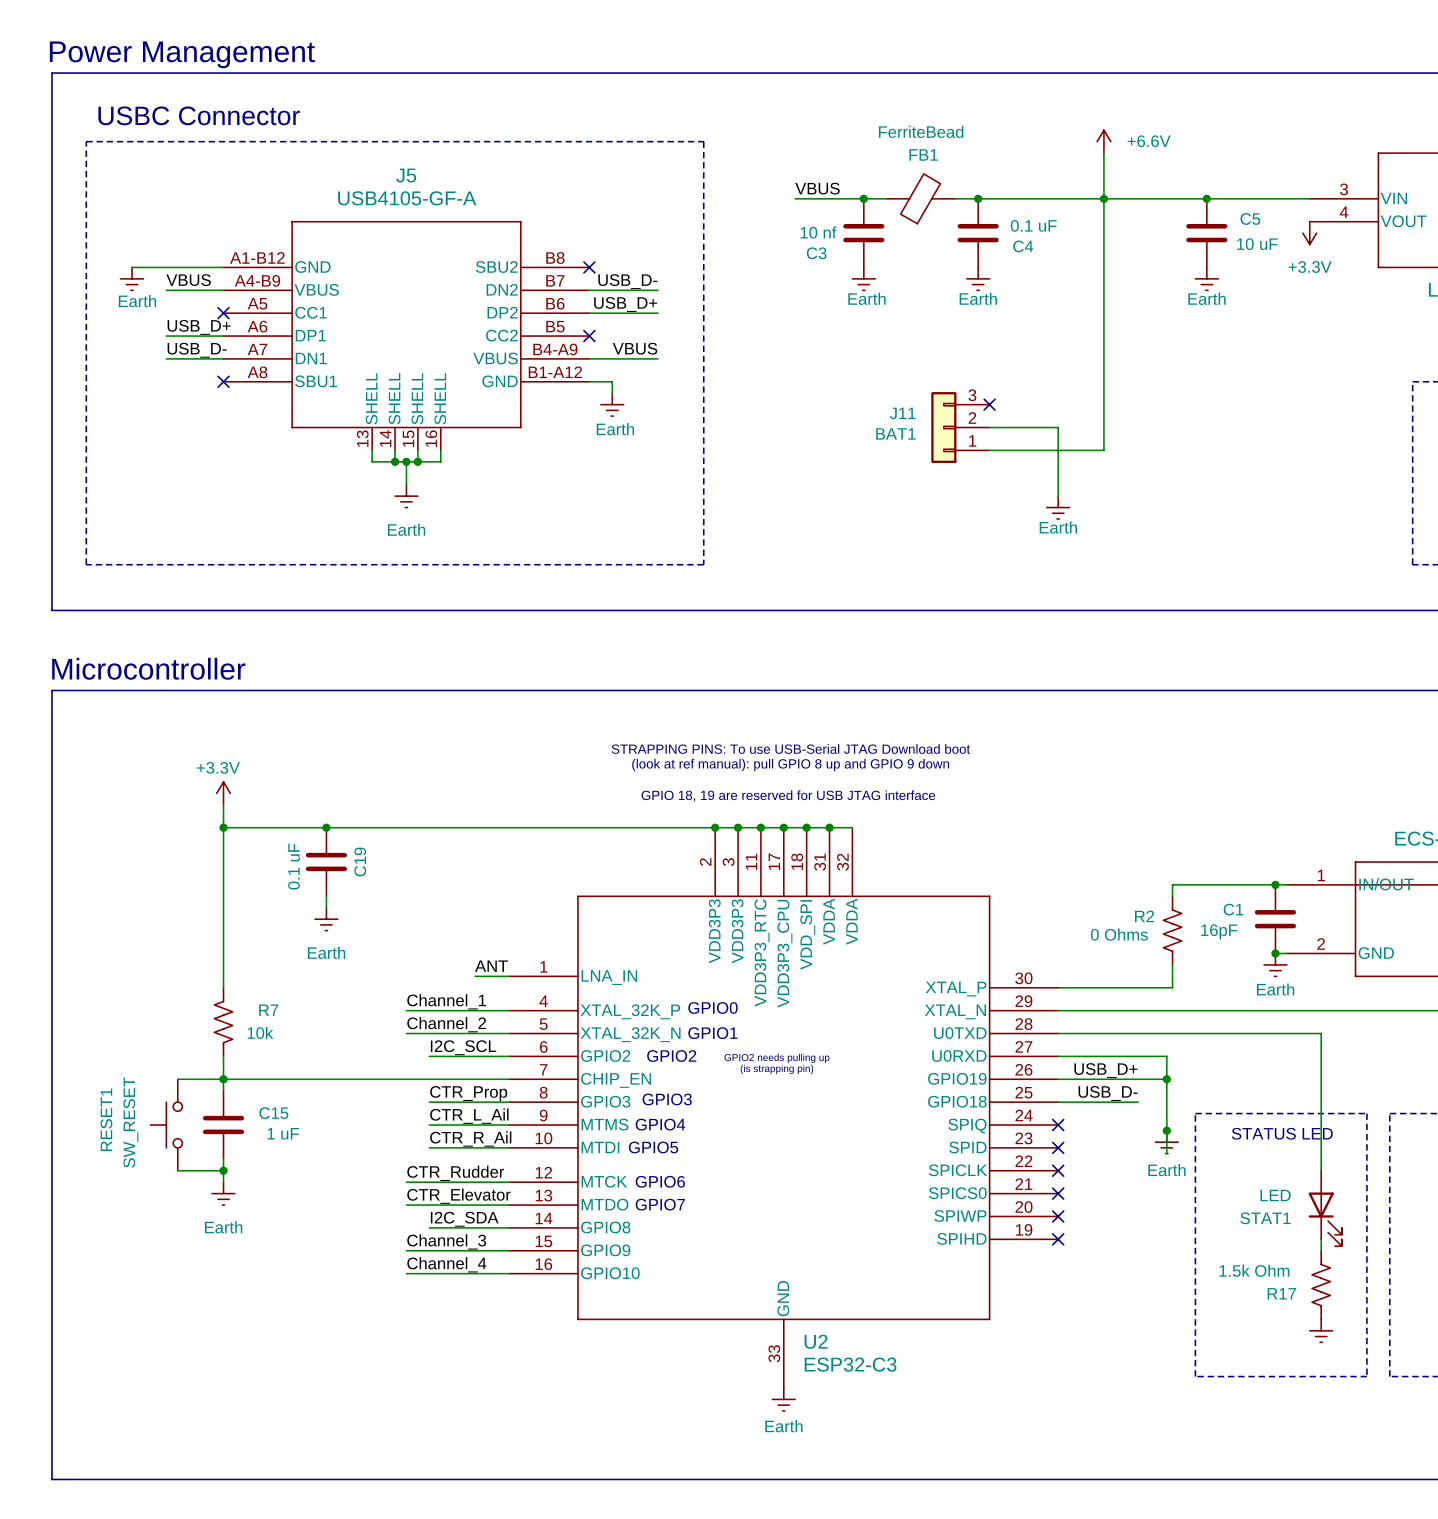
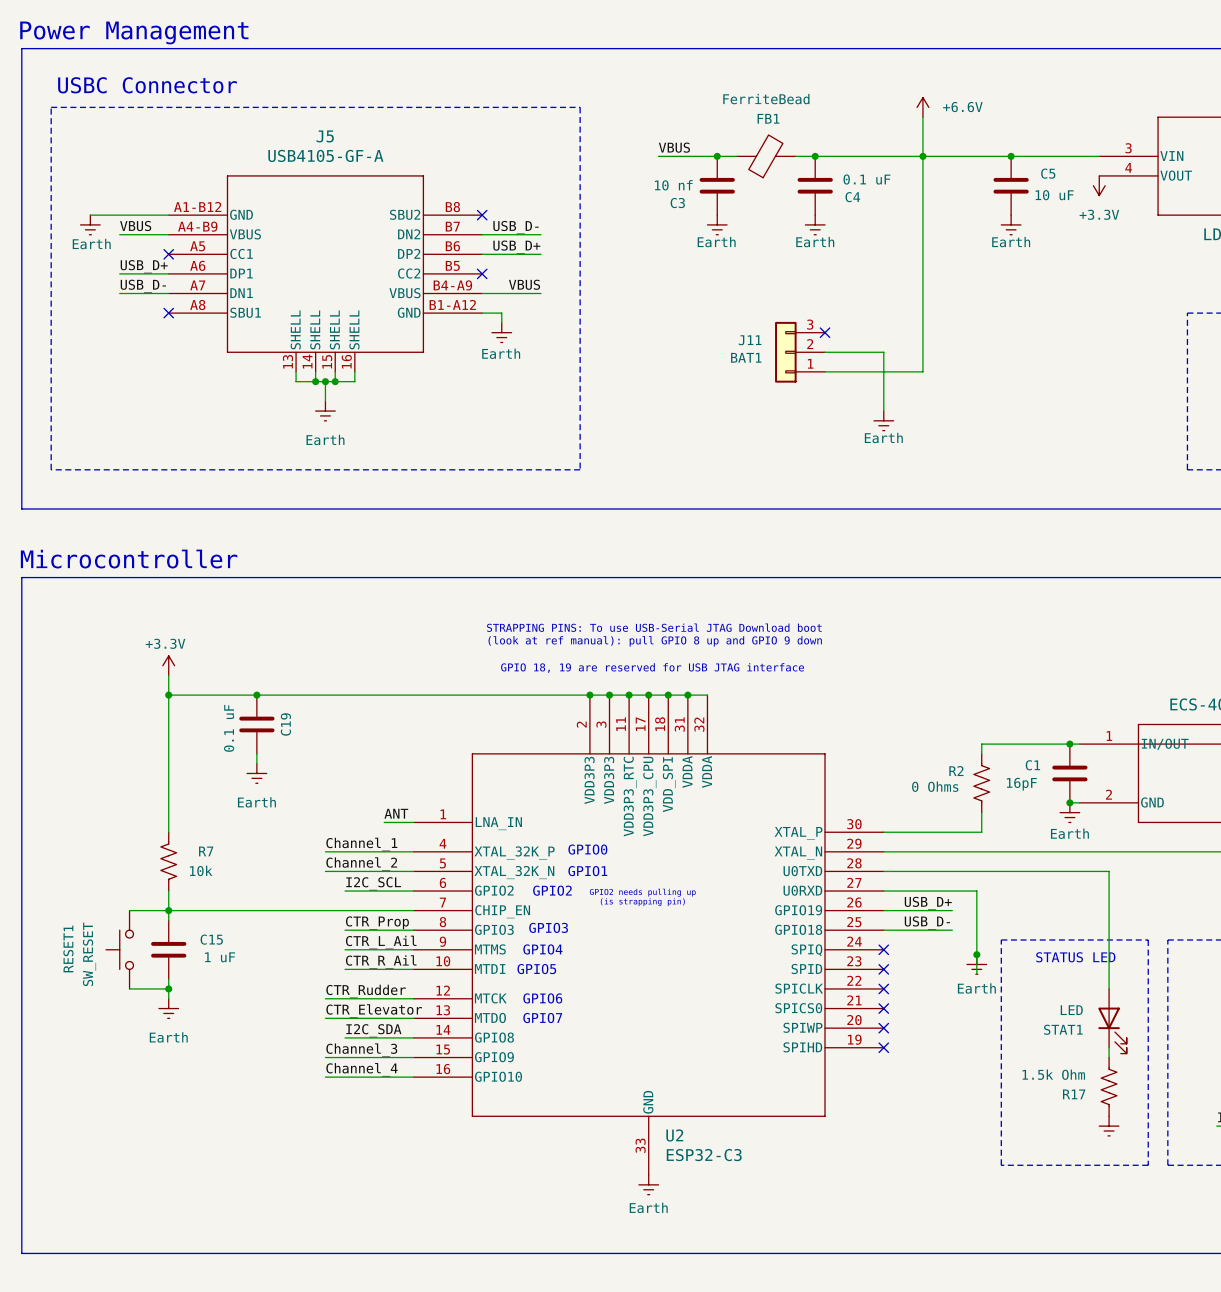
wire: (1138, 1079) (1166, 1079) -> none
junction: (1166, 1079) -> none

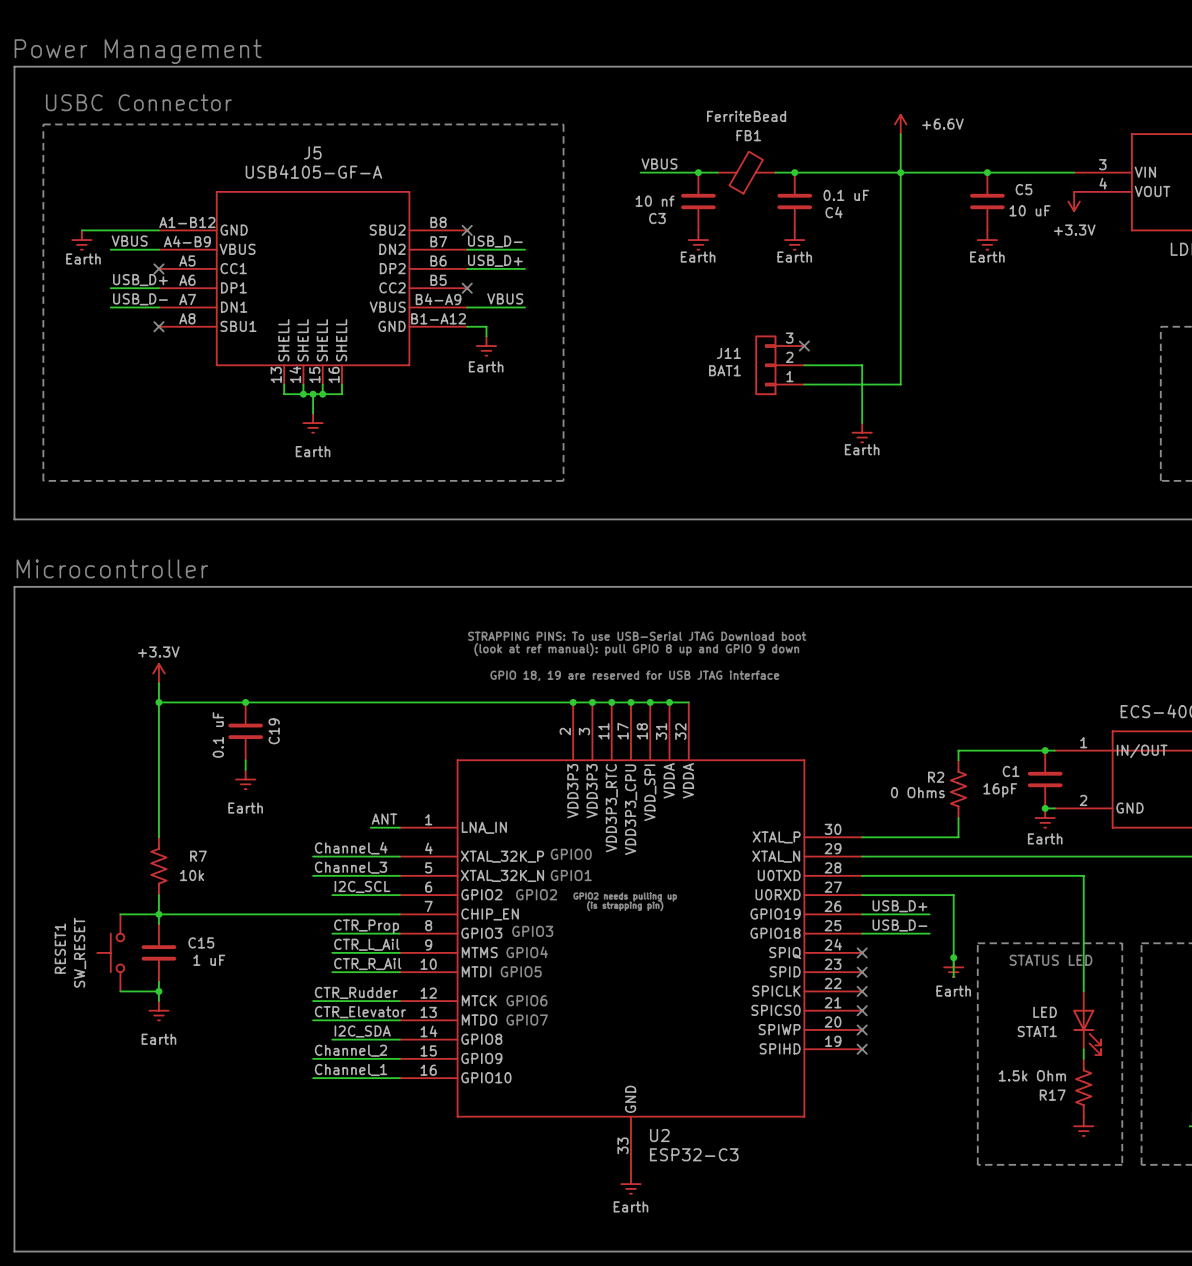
label: Channel_1 (361, 844) -> Channel_4 (351, 848)
label: Channel_2 (361, 864) -> Channel_3 (351, 867)
label: Channel_3 (361, 1050) -> Channel_2 (351, 1050)
label: Channel_4 (361, 1069) -> Channel_1 (351, 1070)

